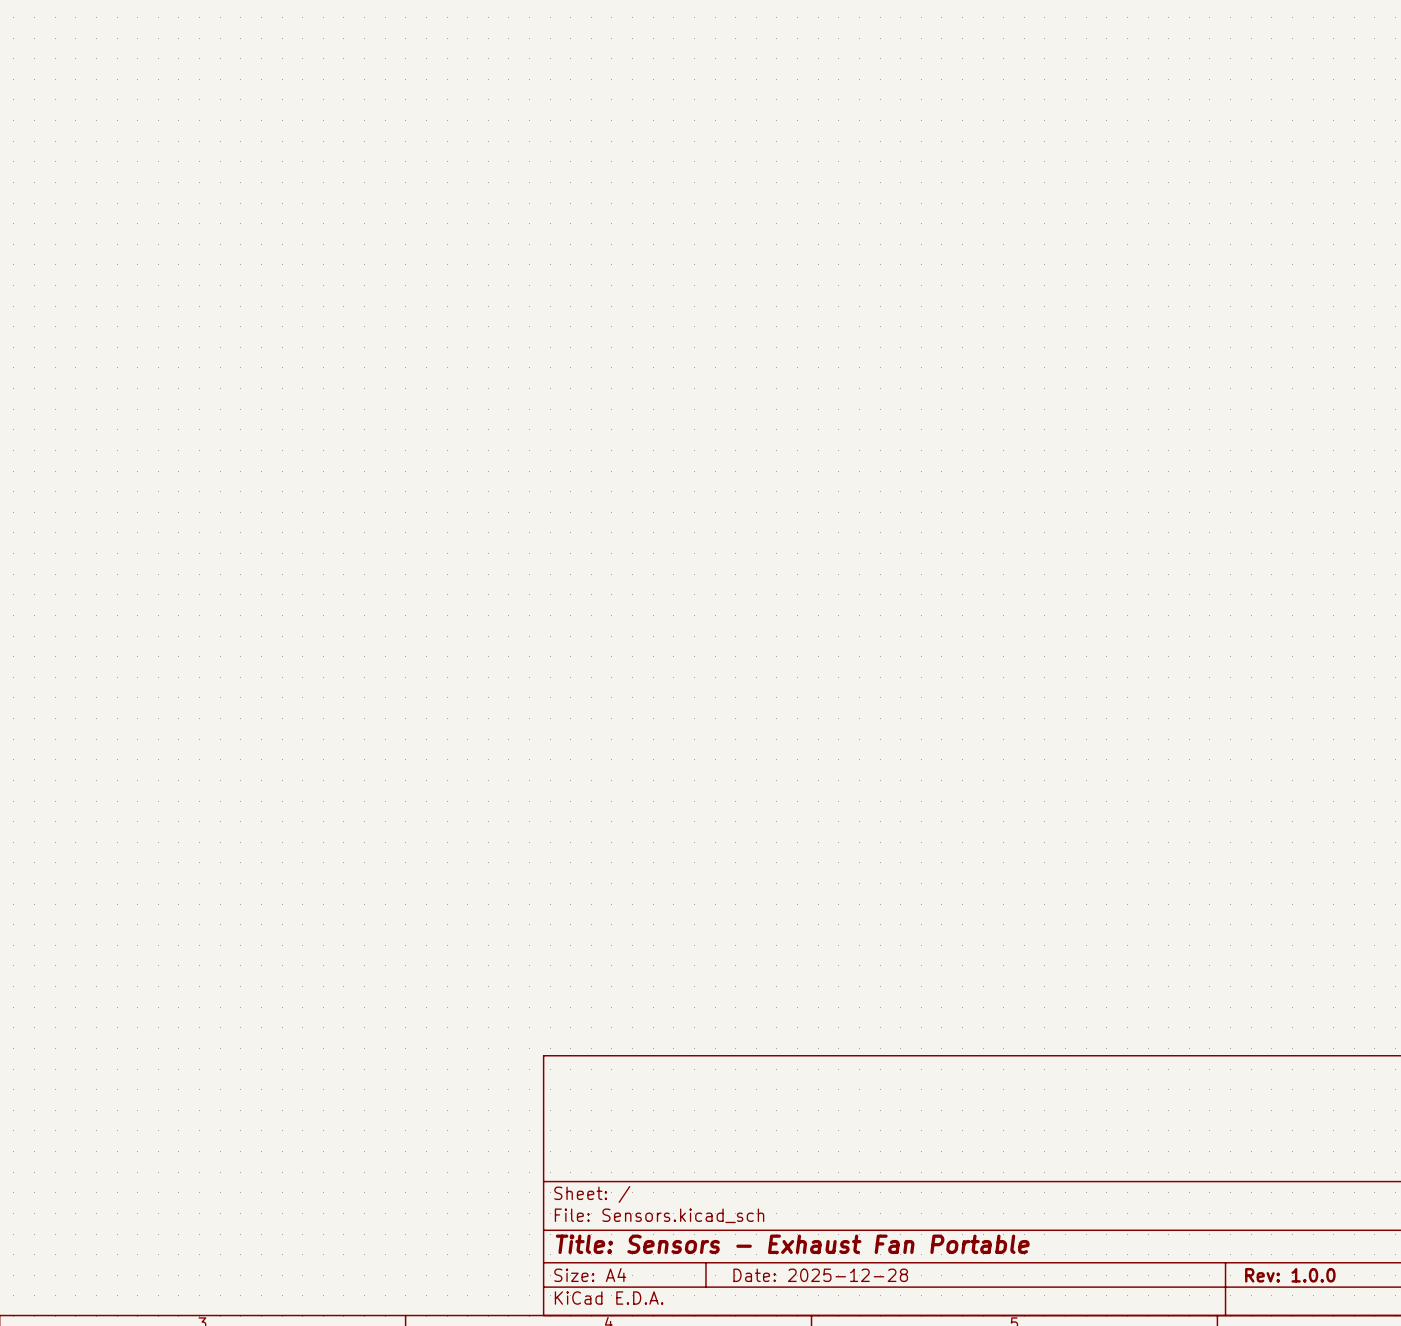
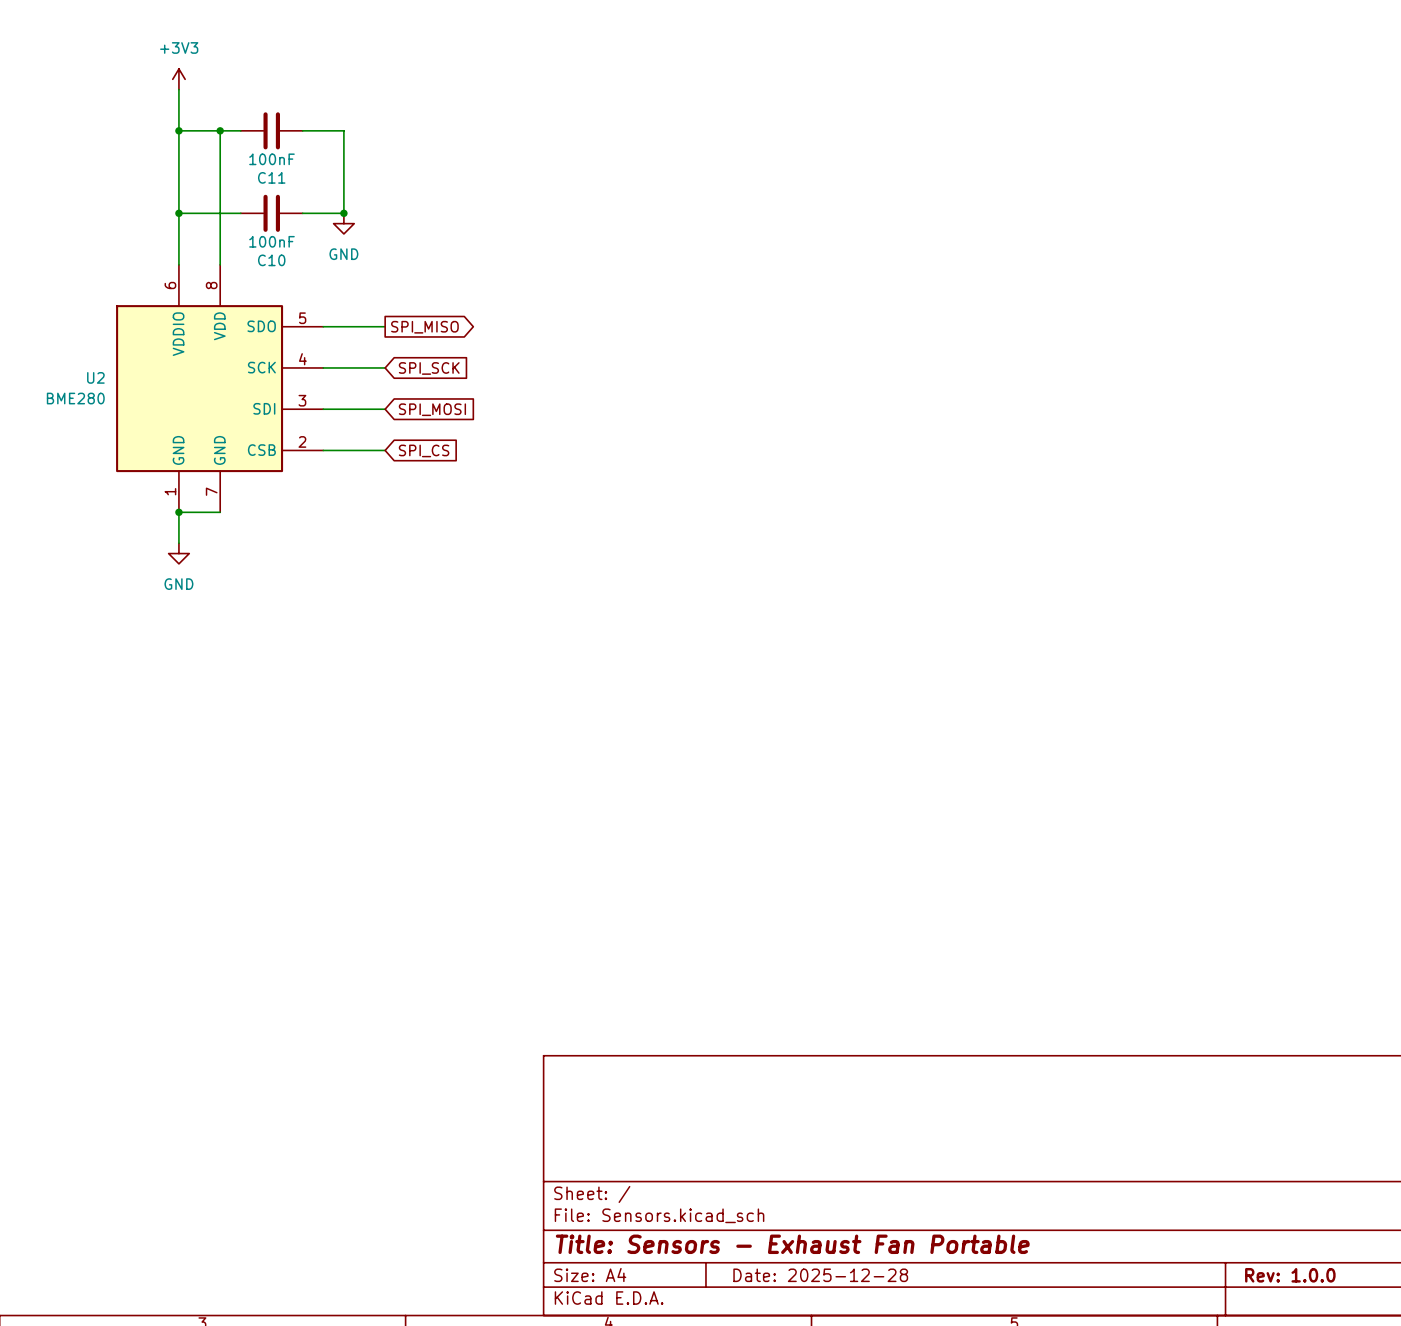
power symbol: none -> +3V3 (178, 79)
wire: none -> (178, 89) (178, 264)
wire: none -> (178, 130) (240, 130)
junction: none -> (178, 130)
wire: none -> (220, 130) (220, 264)
junction: none -> (220, 130)
C11: none -> 100nF (271, 130)
wire: none -> (302, 130) (343, 130) (343, 213) (302, 213)
wire: none -> (178, 213) (240, 213)
junction: none -> (178, 213)
C10: none -> 100nF (271, 213)
junction: none -> (343, 213)
power symbol: none -> GND (343, 223)
wire: none -> (323, 326) (385, 326)
global label: none -> SPI_MISO (424, 327)
wire: none -> (323, 367) (385, 367)
global label: none -> SPI_SCK (429, 368)
U2: none -> BME280 (219, 388)
wire: none -> (323, 409) (385, 409)
global label: none -> SPI_MOSI (432, 409)
wire: none -> (323, 450) (385, 450)
global label: none -> SPI_CS (424, 450)
junction: none -> (178, 512)
wire: none -> (220, 512) (178, 512) (178, 543)
power symbol: none -> GND (178, 553)

